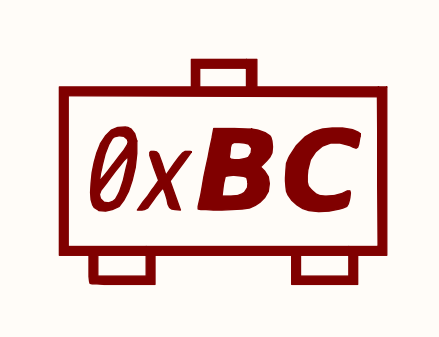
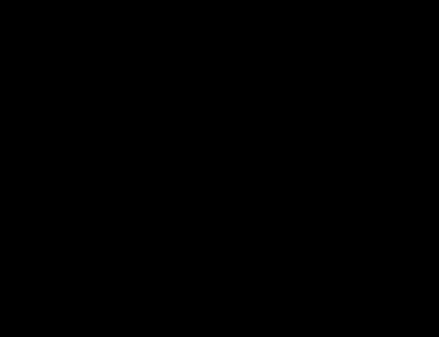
part: (223, 171) -> none

